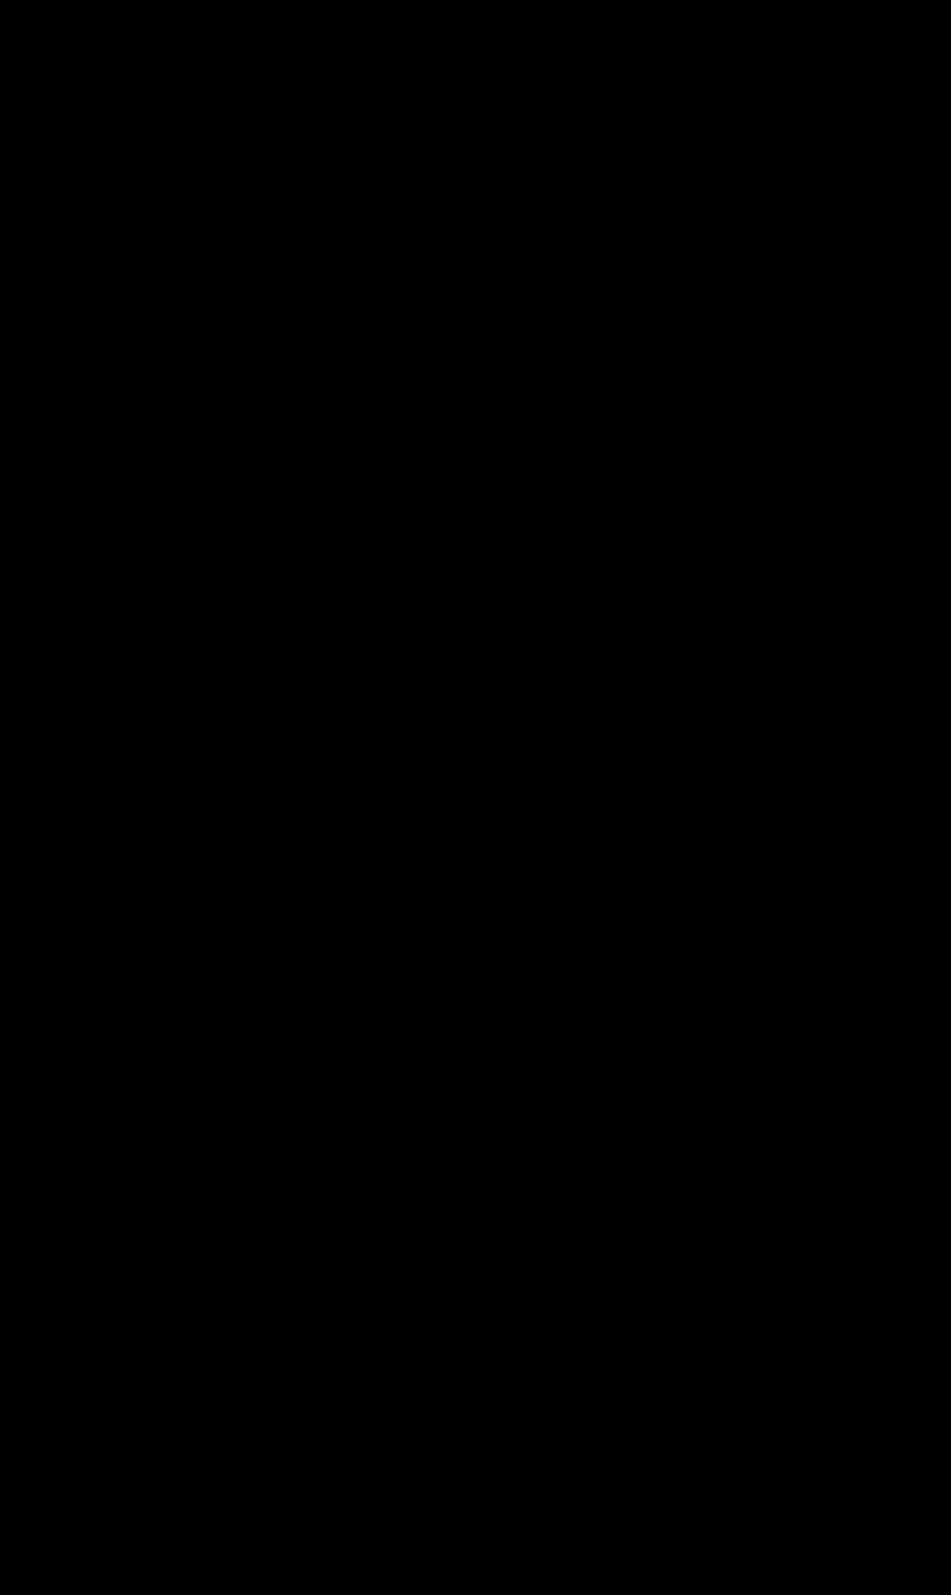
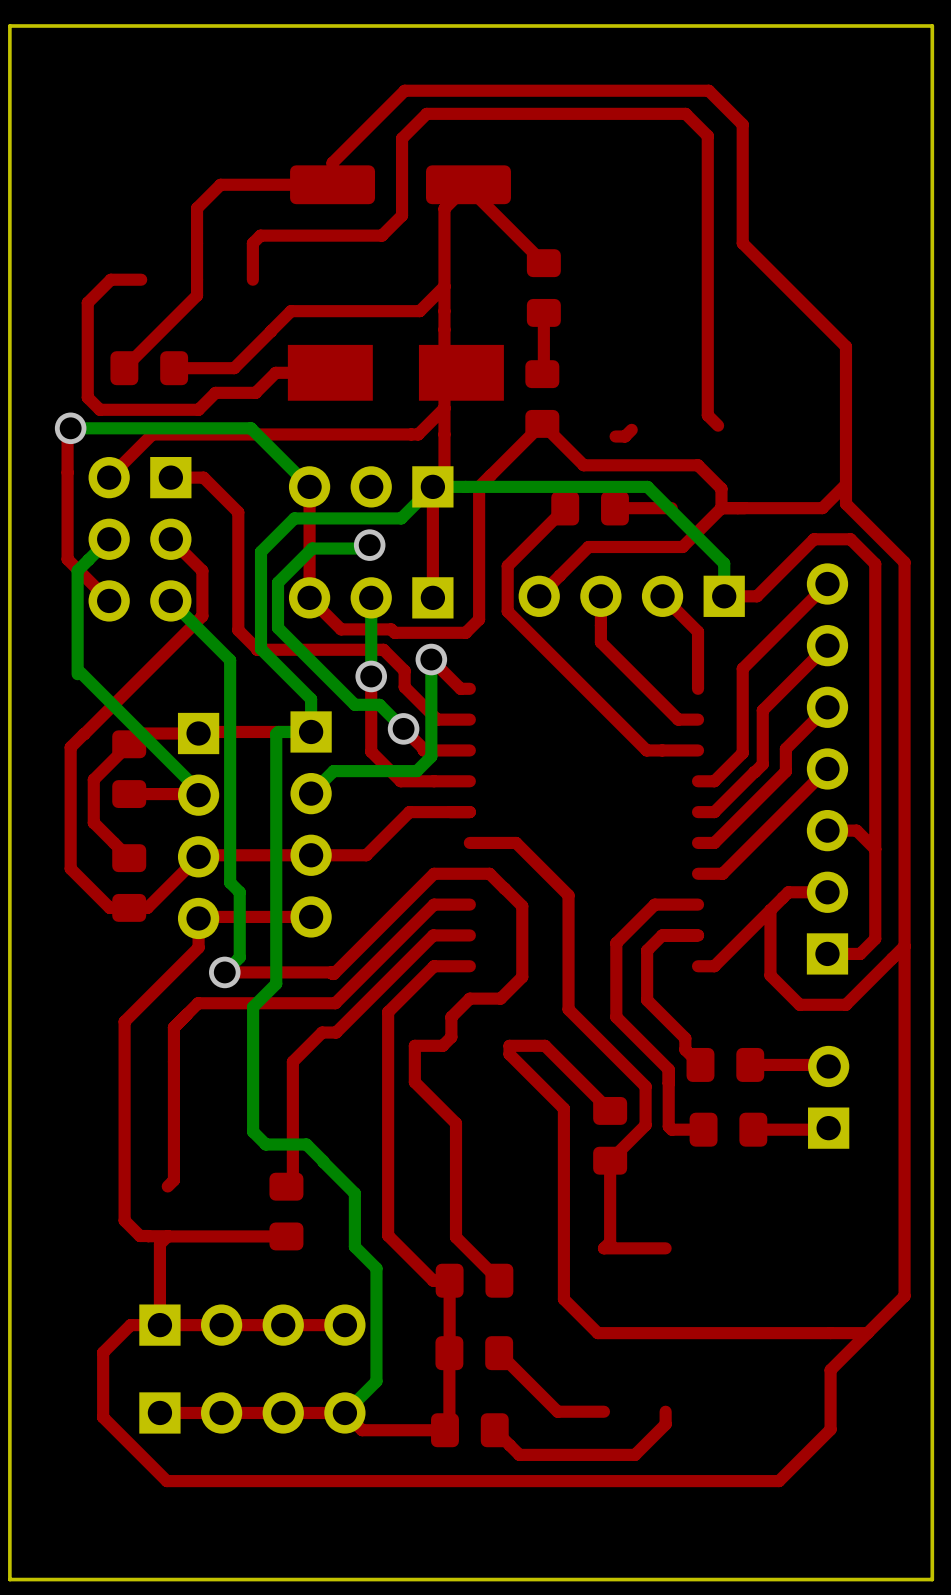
board edge: none -> (932, 25) (932, 1579) (9, 1579) (9, 25) (932, 25)
part: none -> (400, 184)
top track: none -> (543, 263) (468, 187) (468, 184) (444, 208) (444, 475) (432, 486) (432, 597)
top track: none -> (141, 279) (110, 279) (87, 302) (87, 397) (99, 409) (198, 409) (215, 392) (255, 392) (275, 372) (330, 372)
top track: none -> (252, 279) (252, 243) (260, 235) (382, 235) (402, 215) (402, 138) (426, 113) (685, 113) (707, 135) (707, 415) (718, 425)
top track: none -> (444, 286) (419, 311) (291, 311) (234, 368) (174, 368)
part: none -> (543, 288)
top track: none -> (543, 312) (543, 372) (542, 374)
top track: none -> (124, 368) (197, 295) (197, 208) (220, 184) (332, 184) (332, 162) (404, 90) (708, 90) (742, 124) (742, 243) (845, 346) (845, 503) (904, 562) (904, 1296) (830, 1370) (830, 1429) (779, 1481) (166, 1481) (103, 1417) (103, 1352) (130, 1325) (344, 1325)
part: none -> (149, 368)
part: none -> (395, 372)
part: none -> (542, 399)
top track: none -> (444, 408) (418, 434) (152, 434) (109, 477)
top track: none -> (70, 428) (67, 431) (67, 559) (109, 600)
bottom track: none -> (70, 428) (250, 428) (309, 486)
via: none -> (70, 428)
top track: none -> (631, 429) (625, 436) (615, 436)
top track: none -> (490, 475) (542, 423) (583, 465) (698, 465) (721, 488) (721, 508)
top track: none -> (490, 475) (479, 486) (479, 619) (465, 632) (394, 632) (391, 629) (341, 629) (309, 597) (309, 486)
top track: none -> (170, 477) (203, 477) (238, 512) (238, 630) (257, 649) (383, 649) (404, 670) (404, 687) (437, 719) (469, 719)
top track: none -> (845, 484) (822, 508) (721, 508)
part: none -> (371, 486)
top track: none -> (565, 508) (507, 566) (507, 611) (646, 750) (698, 750)
part: none -> (590, 508)
top track: none -> (671, 508) (615, 508)
top track: none -> (721, 508) (682, 546) (588, 546) (539, 596)
bottom track: none -> (109, 539) (77, 570) (77, 674)
part: none -> (140, 539)
top track: none -> (170, 539) (202, 570) (202, 616) (84, 734)
bottom track: none -> (369, 545) (366, 548) (312, 548) (278, 582) (278, 627) (354, 704) (379, 704) (403, 728)
via: none -> (369, 545)
top track: none -> (724, 579) (724, 596) (756, 596) (814, 539) (850, 539) (875, 563) (875, 938) (860, 953) (827, 953)
top track: none -> (827, 583) (742, 668) (742, 753) (714, 781) (698, 781)
top track: none -> (600, 596) (600, 642) (678, 719) (698, 719)
part: none -> (631, 596)
top track: none -> (662, 596) (698, 631) (698, 688)
bottom track: none -> (724, 596) (724, 563) (647, 486) (432, 486) (401, 518) (294, 518) (261, 551) (261, 649) (311, 699) (311, 731) (278, 731) (276, 734) (276, 983) (253, 1007) (253, 1131) (265, 1144) (306, 1144) (354, 1193) (354, 1246) (376, 1268) (376, 1381) (344, 1412)
bottom track: none -> (371, 597) (371, 676)
part: none -> (371, 597)
bottom track: none -> (170, 600) (230, 660) (230, 882) (239, 892) (239, 957) (224, 972)
top track: none -> (827, 645) (762, 710) (762, 764) (714, 812) (698, 812)
top track: none -> (431, 659) (460, 688) (469, 688)
bottom track: none -> (431, 659) (431, 756) (416, 771) (333, 771) (311, 793)
via: none -> (431, 659)
bottom track: none -> (80, 672) (201, 793)
top track: none -> (371, 676) (371, 751) (400, 781) (469, 781)
via: none -> (371, 676)
top track: none -> (827, 707) (785, 748) (785, 771) (714, 842) (698, 842)
top track: none -> (403, 728) (423, 750) (469, 750)
via: none -> (403, 728)
top track: none -> (83, 734) (70, 747) (70, 868) (109, 907) (147, 907) (200, 855) (366, 855) (409, 812) (469, 812)
top track: none -> (311, 738) (311, 731) (140, 733) (93, 779) (93, 822)
top track: none -> (827, 768) (722, 873) (698, 873)
part: none -> (827, 768)
part: none -> (129, 769)
top track: none -> (197, 794) (129, 794)
top track: none -> (93, 822) (129, 858)
part: none -> (311, 824)
part: none -> (198, 825)
top track: none -> (827, 830) (856, 830) (875, 849)
top track: none -> (469, 842) (516, 842) (568, 895) (568, 1009) (645, 1086) (645, 1125) (610, 1160) (610, 1242) (603, 1248) (665, 1248)
part: none -> (129, 883)
top track: none -> (504, 888) (522, 906) (522, 977) (500, 998) (469, 998) (451, 1017) (451, 1037) (442, 1045) (414, 1045) (414, 1082) (456, 1123) (456, 1237) (499, 1280)
top track: none -> (504, 888) (489, 873) (434, 873) (333, 973) (331, 972) (224, 972)
top track: none -> (827, 892) (788, 892) (714, 966) (698, 966)
top track: none -> (469, 904) (434, 904) (335, 1003) (198, 1003) (173, 1027) (173, 1180) (167, 1186)
top track: none -> (698, 904) (654, 904) (616, 943) (616, 1017) (668, 1069) (668, 1126) (671, 1129) (703, 1129)
top track: none -> (770, 910) (770, 975) (799, 1004) (845, 1004) (904, 946)
top track: none -> (311, 916) (200, 916) (198, 947) (124, 1021) (124, 1220) (140, 1236) (148, 1236)
top track: none -> (469, 935) (433, 935) (336, 1032) (322, 1032) (292, 1061) (292, 1180) (286, 1186)
top track: none -> (698, 935) (662, 935) (647, 950) (647, 1000) (685, 1038) (685, 1049) (700, 1064)
top track: none -> (469, 966) (434, 966) (388, 1012) (388, 1235) (433, 1280) (449, 1280) (449, 1352)
via: none -> (224, 972)
part: none -> (725, 1064)
top track: none -> (750, 1064) (827, 1064) (828, 1066)
part: none -> (828, 1097)
top track: none -> (610, 1110) (545, 1045) (509, 1045) (509, 1054) (563, 1108) (563, 1299) (597, 1333) (867, 1333)
top track: none -> (828, 1128) (827, 1129) (753, 1129)
part: none -> (728, 1129)
part: none -> (610, 1135)
part: none -> (286, 1211)
top track: none -> (148, 1236) (167, 1236) (159, 1244) (159, 1325) (167, 1317)
top track: none -> (286, 1236) (167, 1236)
part: none -> (474, 1280)
part: none -> (252, 1325)
top track: none -> (449, 1353) (449, 1425) (444, 1430) (362, 1430) (344, 1412) (159, 1412) (161, 1414)
part: none -> (474, 1353)
top track: none -> (499, 1353) (557, 1411) (603, 1411)
top track: none -> (665, 1411) (665, 1424) (635, 1454) (519, 1454) (494, 1430)
part: none -> (252, 1412)
part: none -> (469, 1430)

